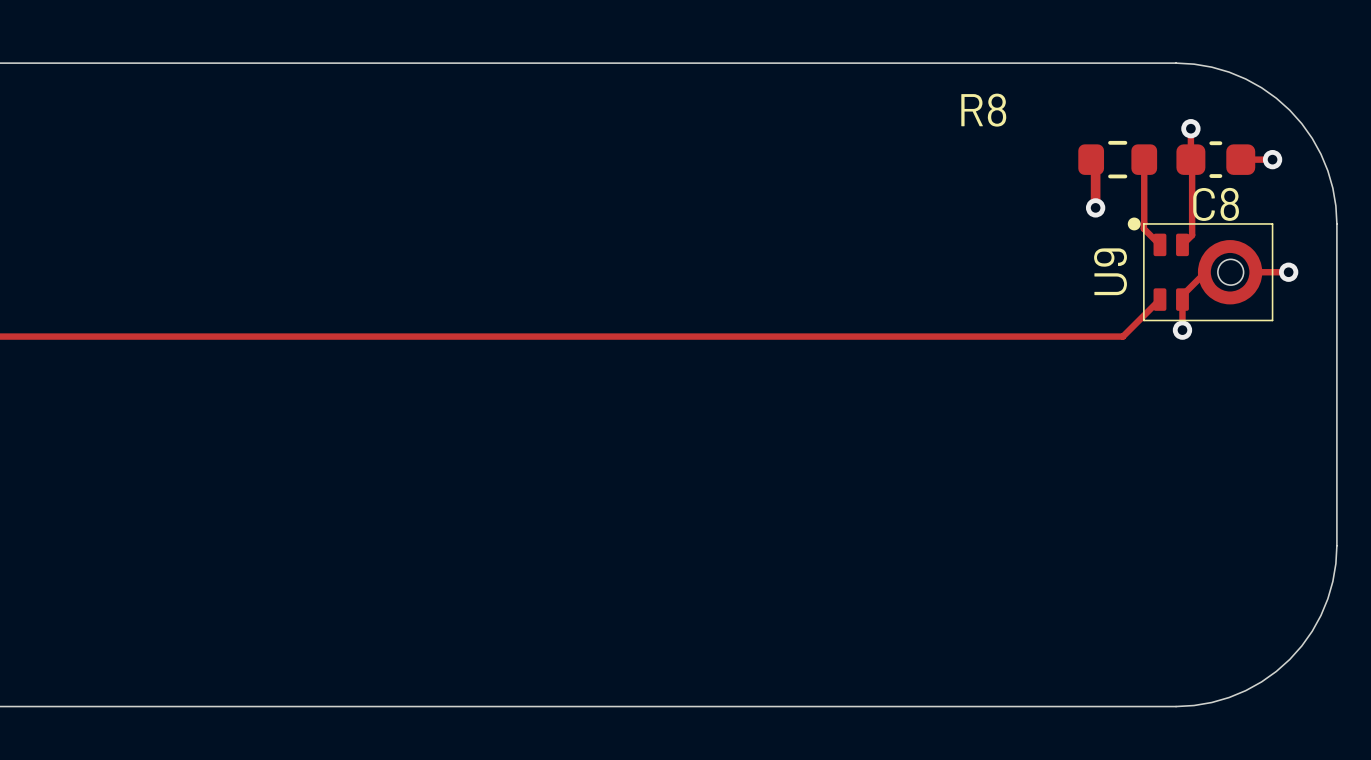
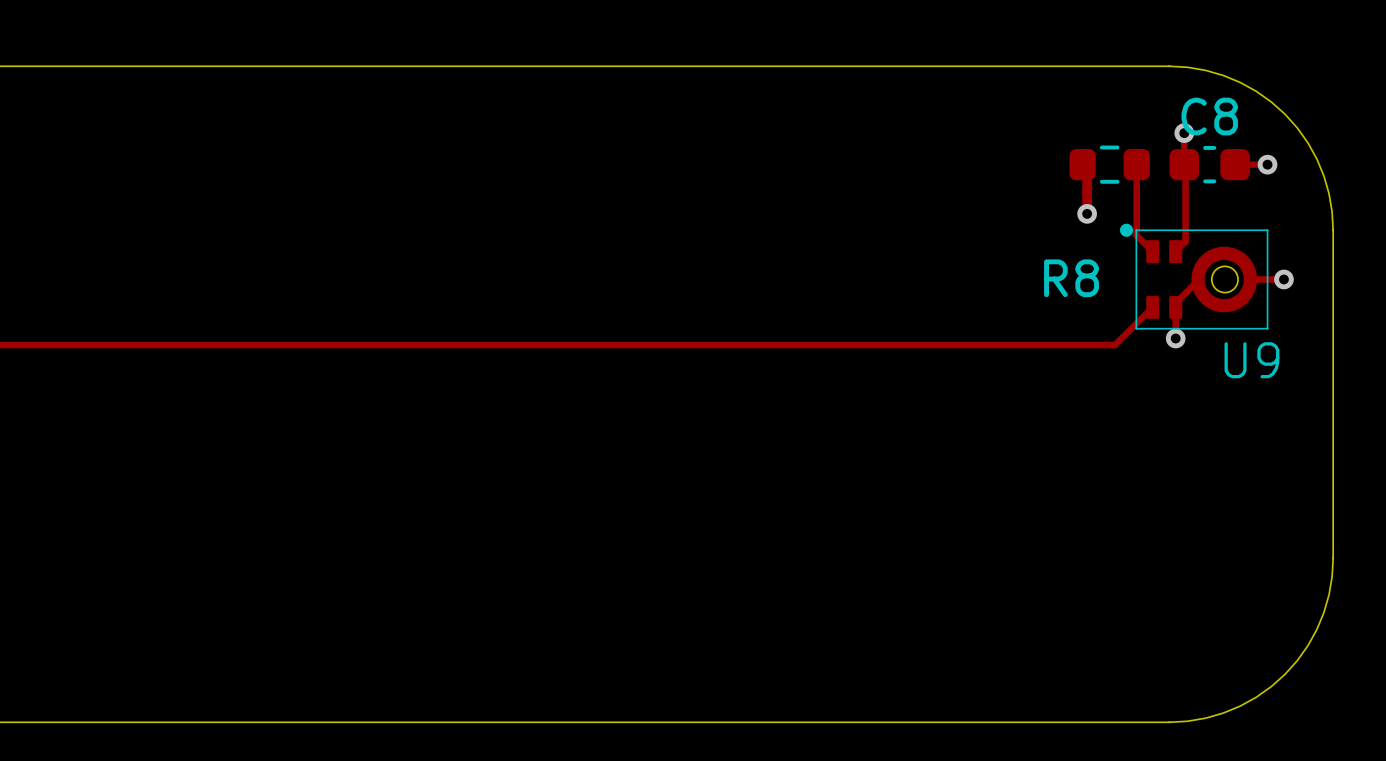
R8 name position: R8 (983, 110) -> R8 (1071, 278)
C8 name position: C8 (1216, 204) -> C8 (1209, 116)
U9 name rotation: 0° (1110, 271) -> 90° clockwise (1251, 360)
U9 name position: U9 (1110, 271) -> U9 (1251, 360)

